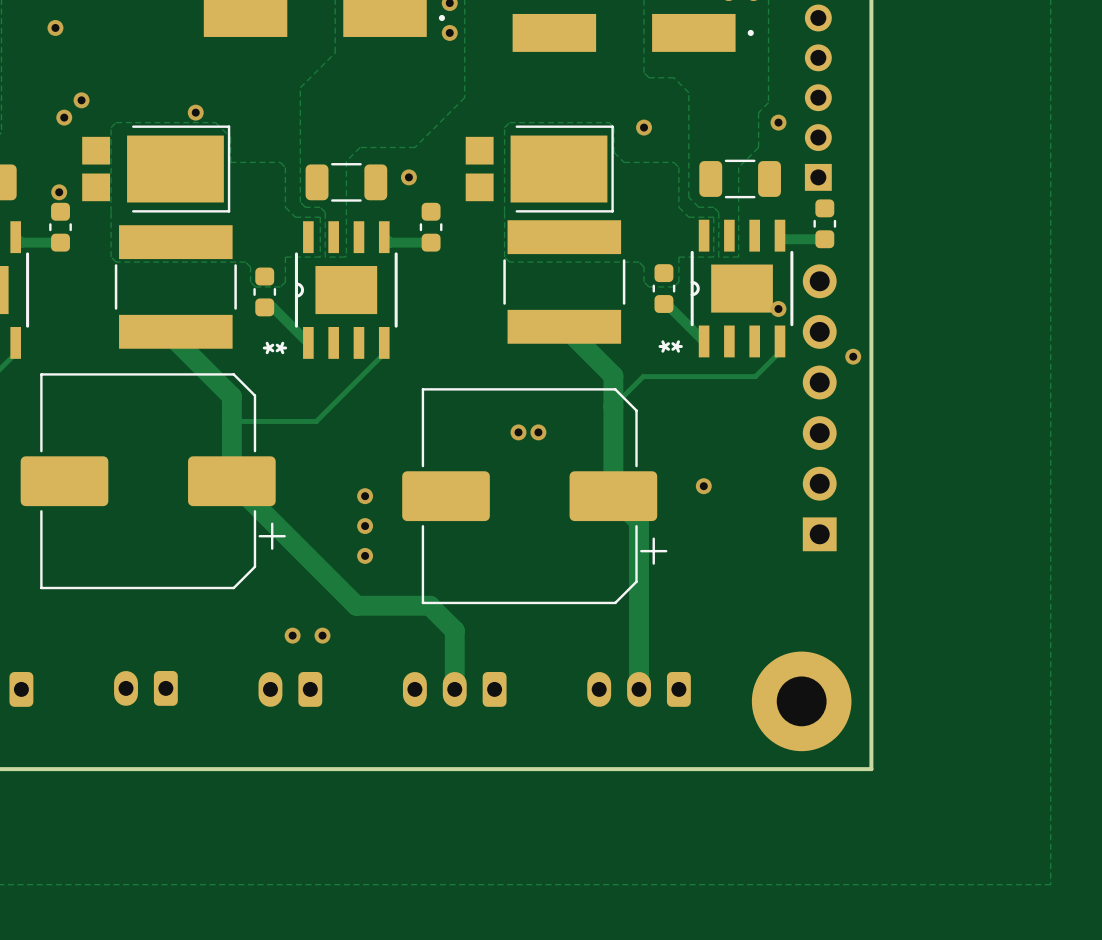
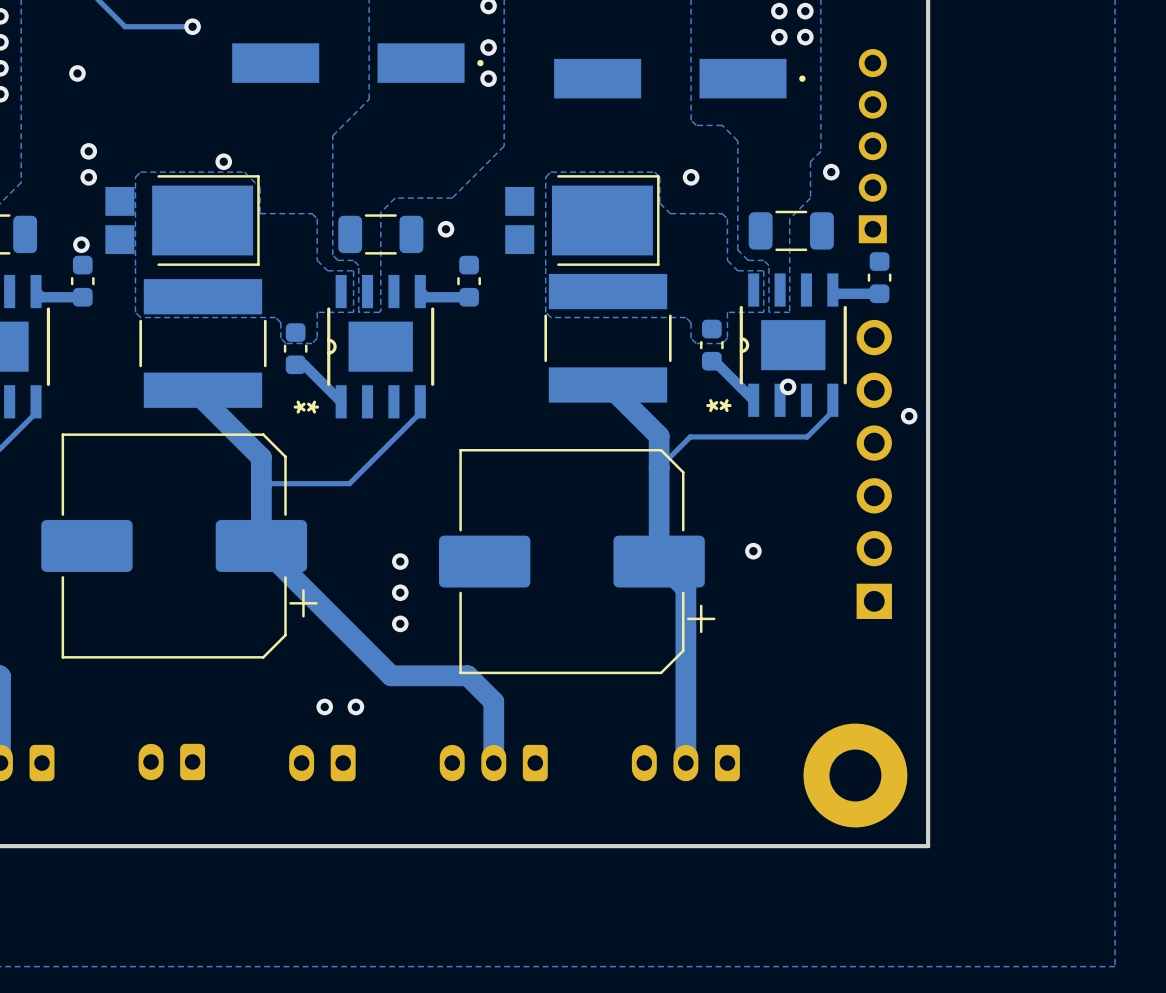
via: (81, 100) -> none
via: none -> (88, 151)
via: (64, 117) -> none
via: none -> (88, 177)
via position: (778, 308) -> (788, 386)
via: (518, 432) -> none
via: (538, 432) -> none

